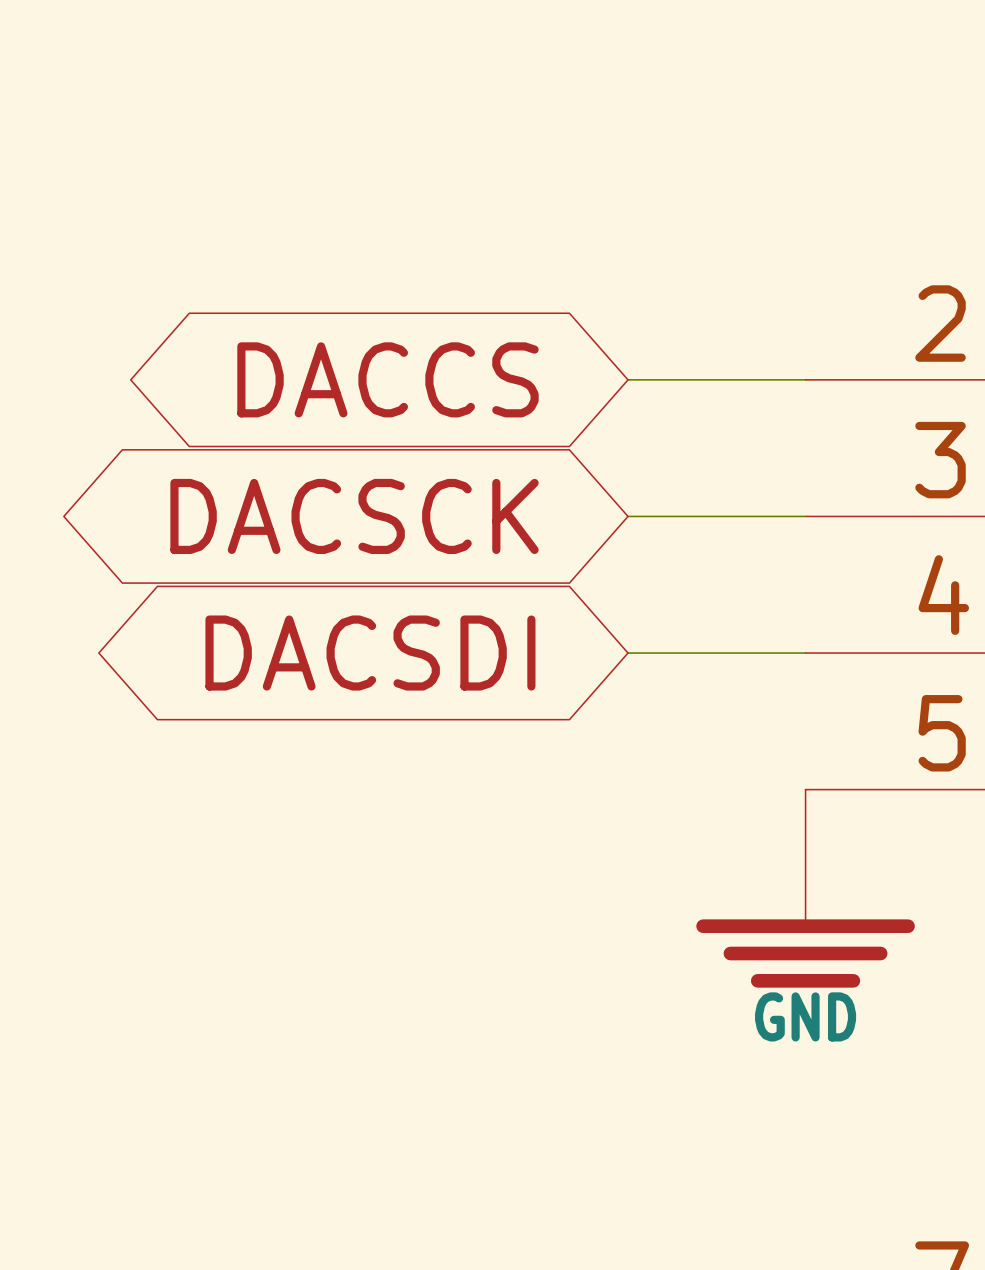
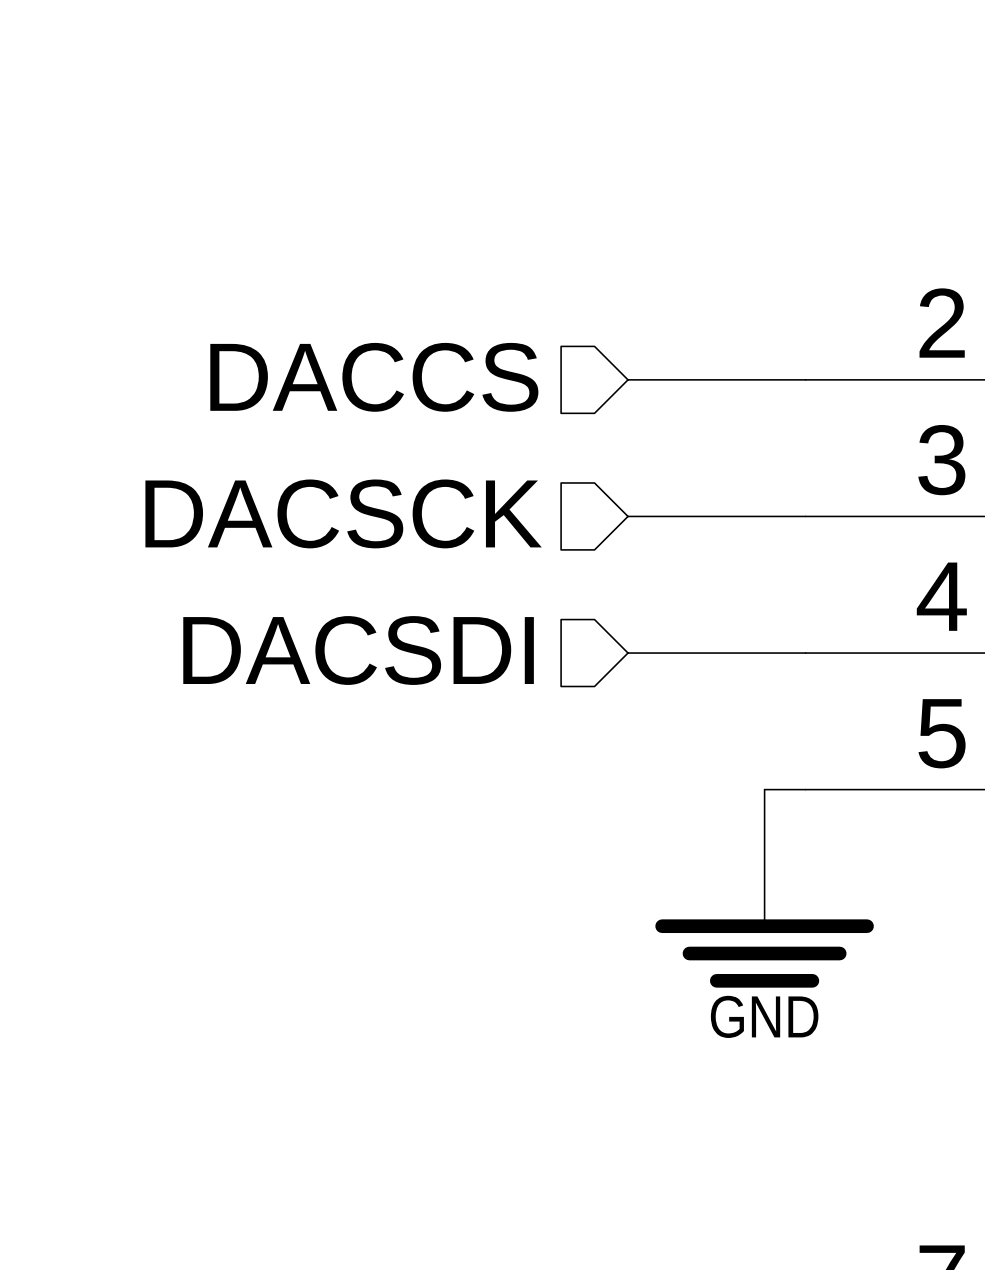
hierarchical label: none -> DACCS (374, 377)
global label: DACCS (387, 379) -> none
hierarchical label: none -> DACSCK (343, 513)
global label: DACSCK (354, 516) -> none
hierarchical label: none -> DACSDI (358, 650)
global label: DACSDI (370, 653) -> none
wire: none -> (764, 789) (805, 789)
power symbol position: GND (805, 888) -> GND (764, 888)

